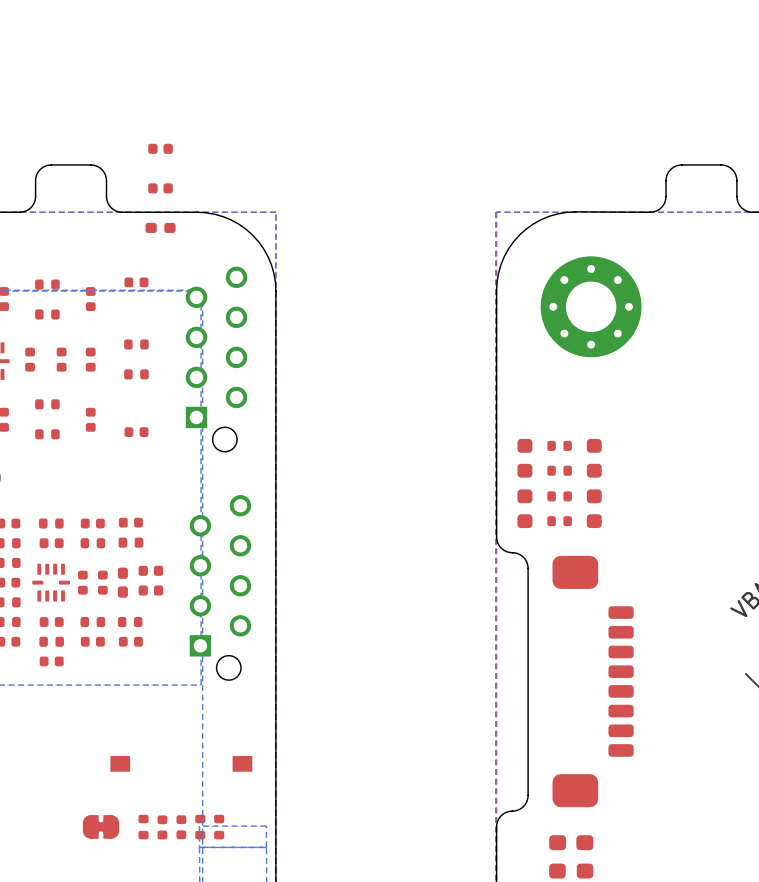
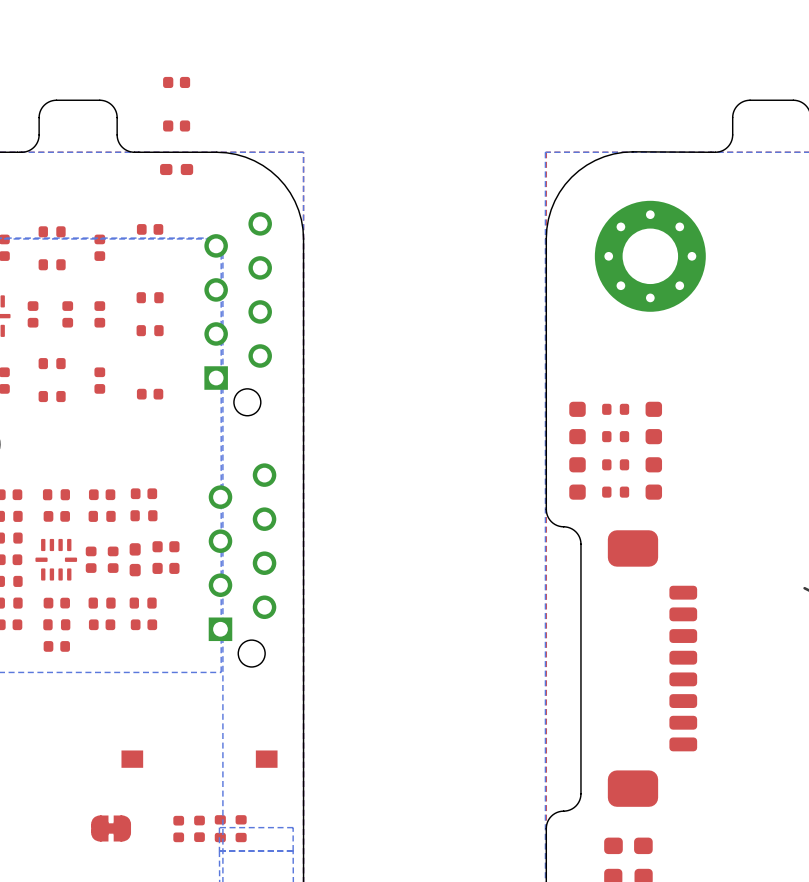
part: (143, 827) -> none

